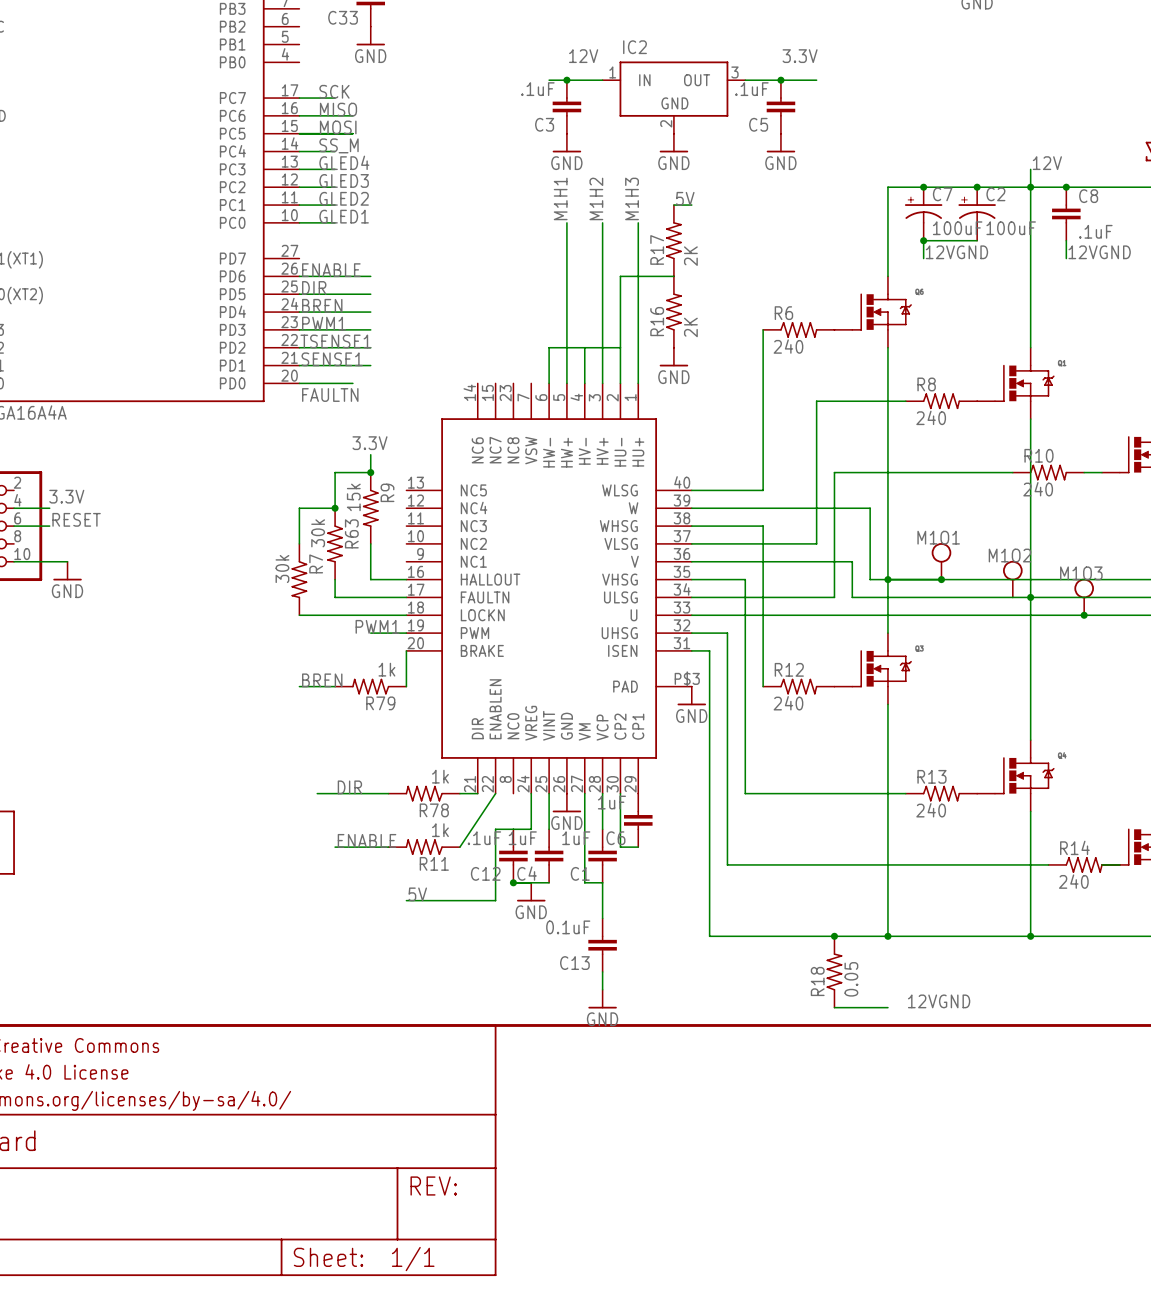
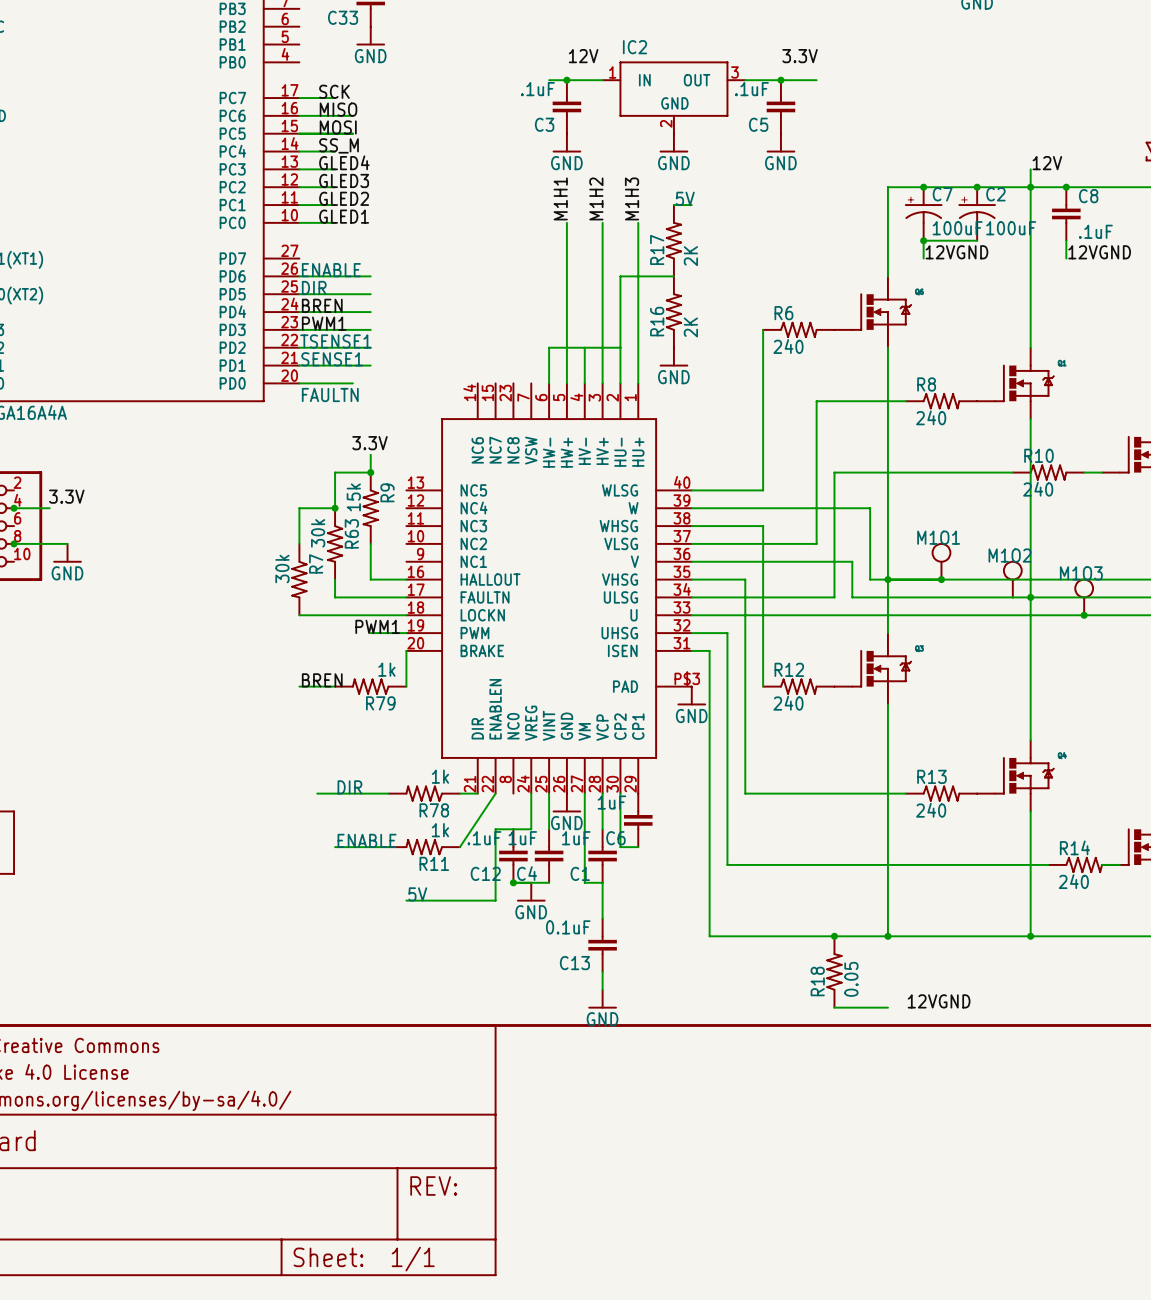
junction: none -> (14, 508)
label: RESET (76, 519) -> none
wire: (14, 526) (49, 526) -> none
junction: none -> (14, 543)
wire: (14, 561) (67, 561) -> (14, 543) (67, 543)
power symbol position: GND (67, 571) -> GND (67, 553)

